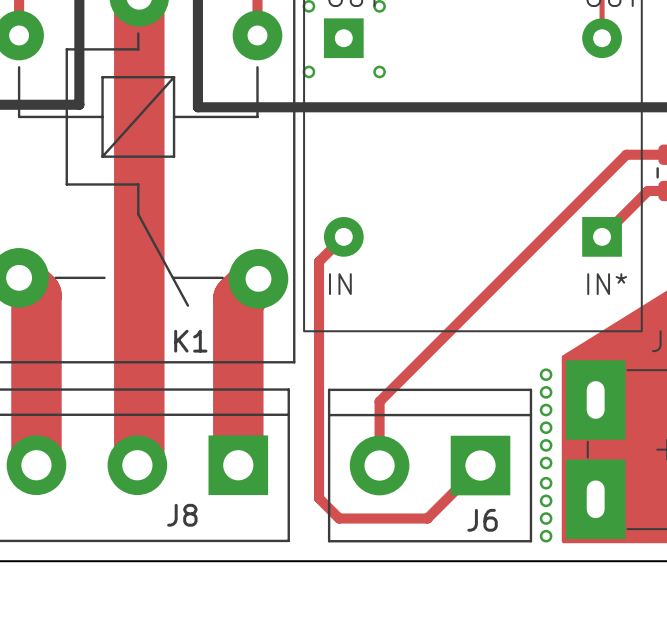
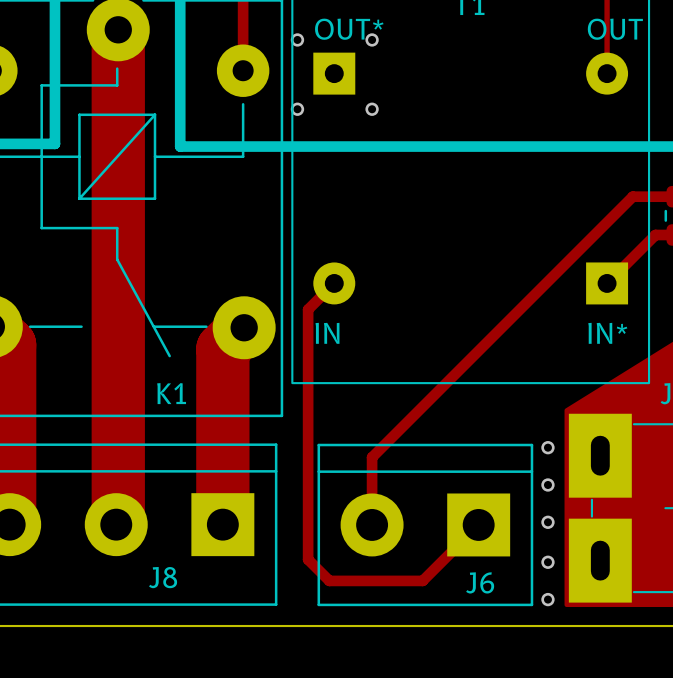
via: (546, 374) -> none
via: (546, 410) -> none
via: (546, 445) -> none
via: (546, 483) -> none
via: (546, 518) -> none

